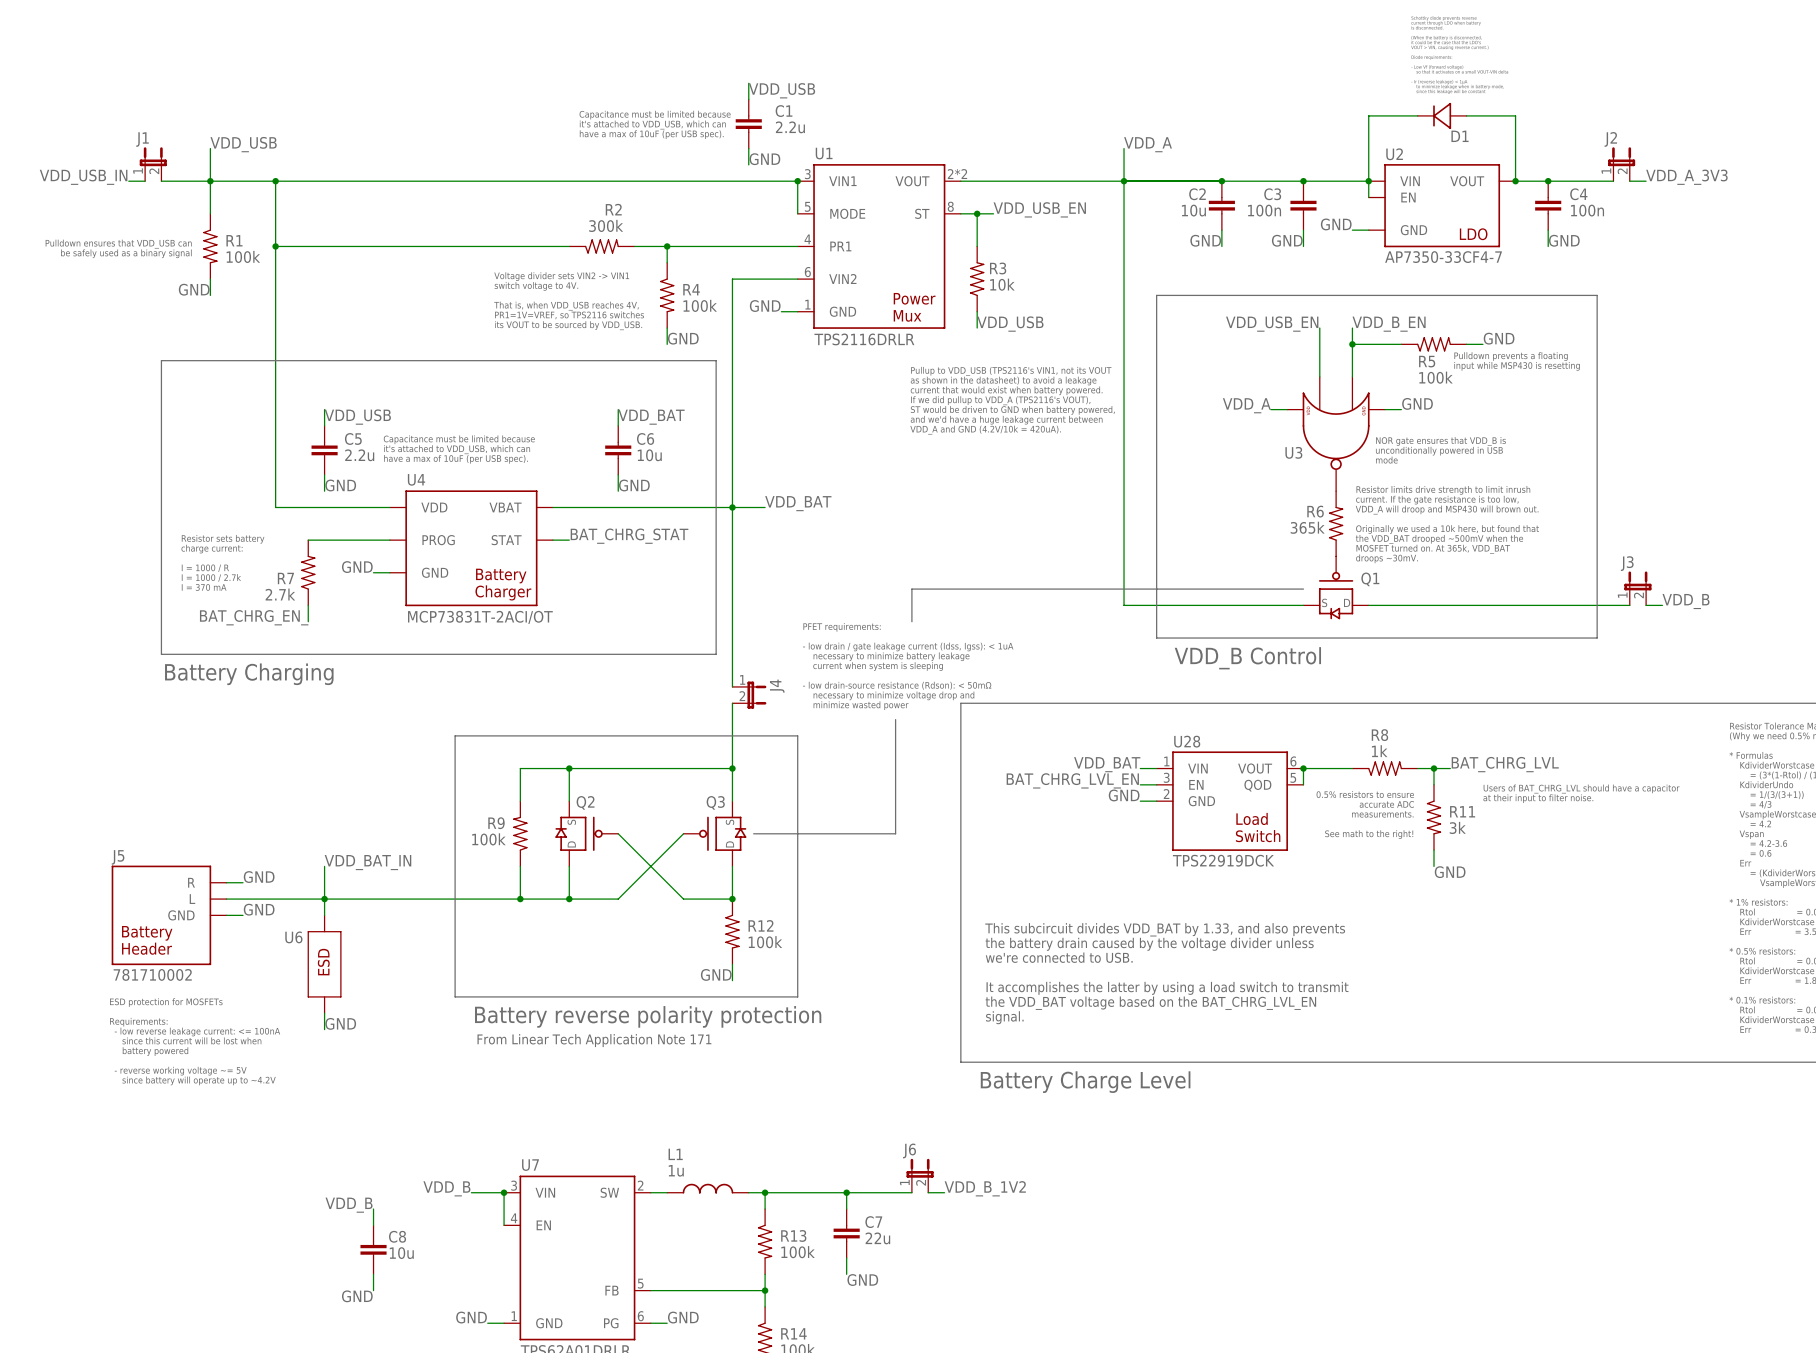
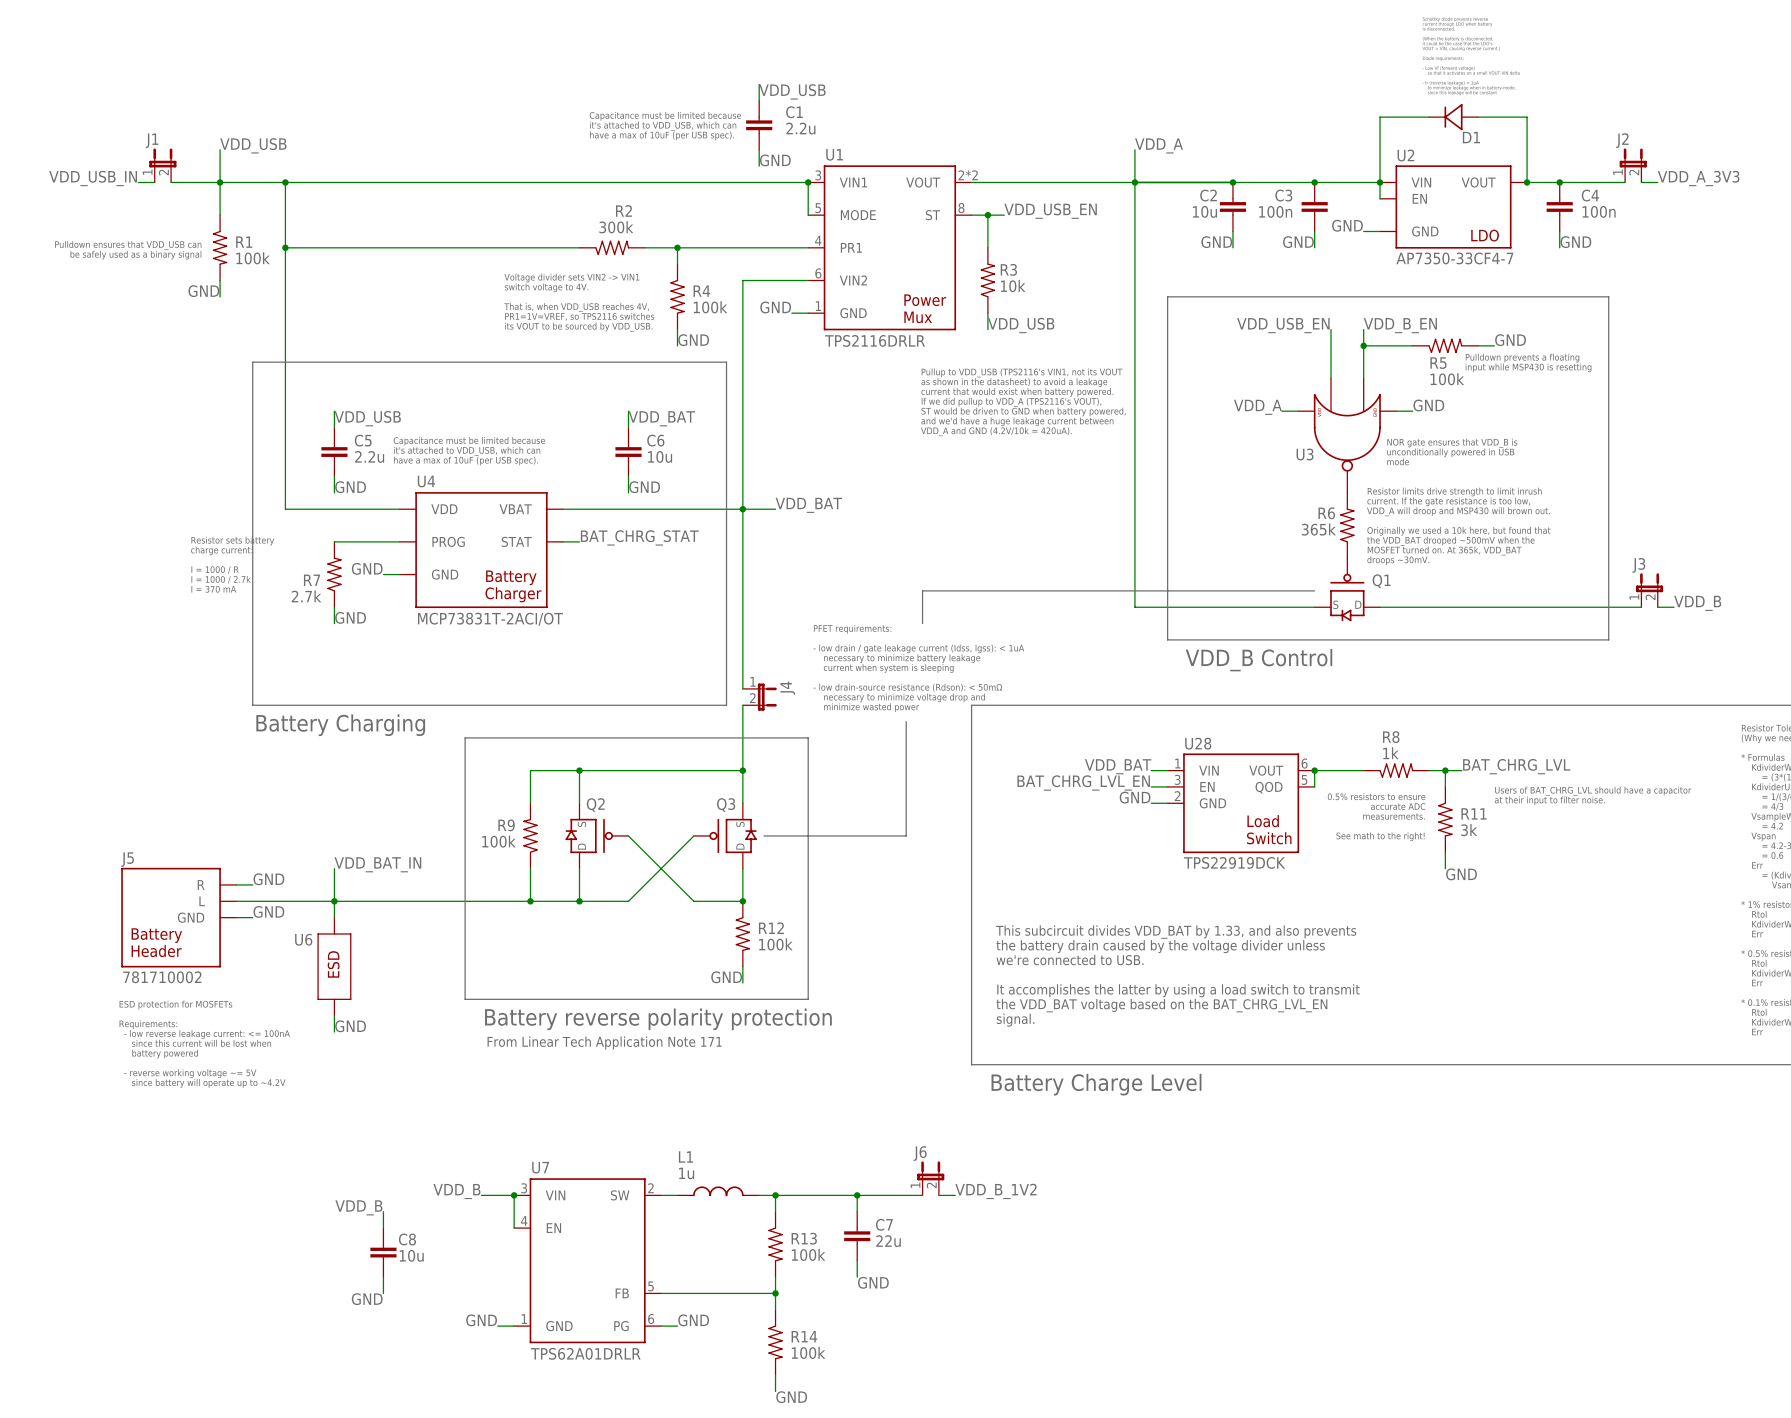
line: (243, 360) (161, 360) (161, 654) (716, 654) -> (252, 362) (252, 705) (726, 705) (726, 656)
wire: (308, 540) (324, 540) -> none
R7 position: (308, 572) -> (334, 574)
wire: (308, 605) (308, 621) -> (334, 607) (334, 623)
label: none -> GND (350, 617)
label: BAT_CHRG_EN_ (254, 617) -> none
text position: Battery Charging (249, 674) -> Battery Charging (340, 725)

